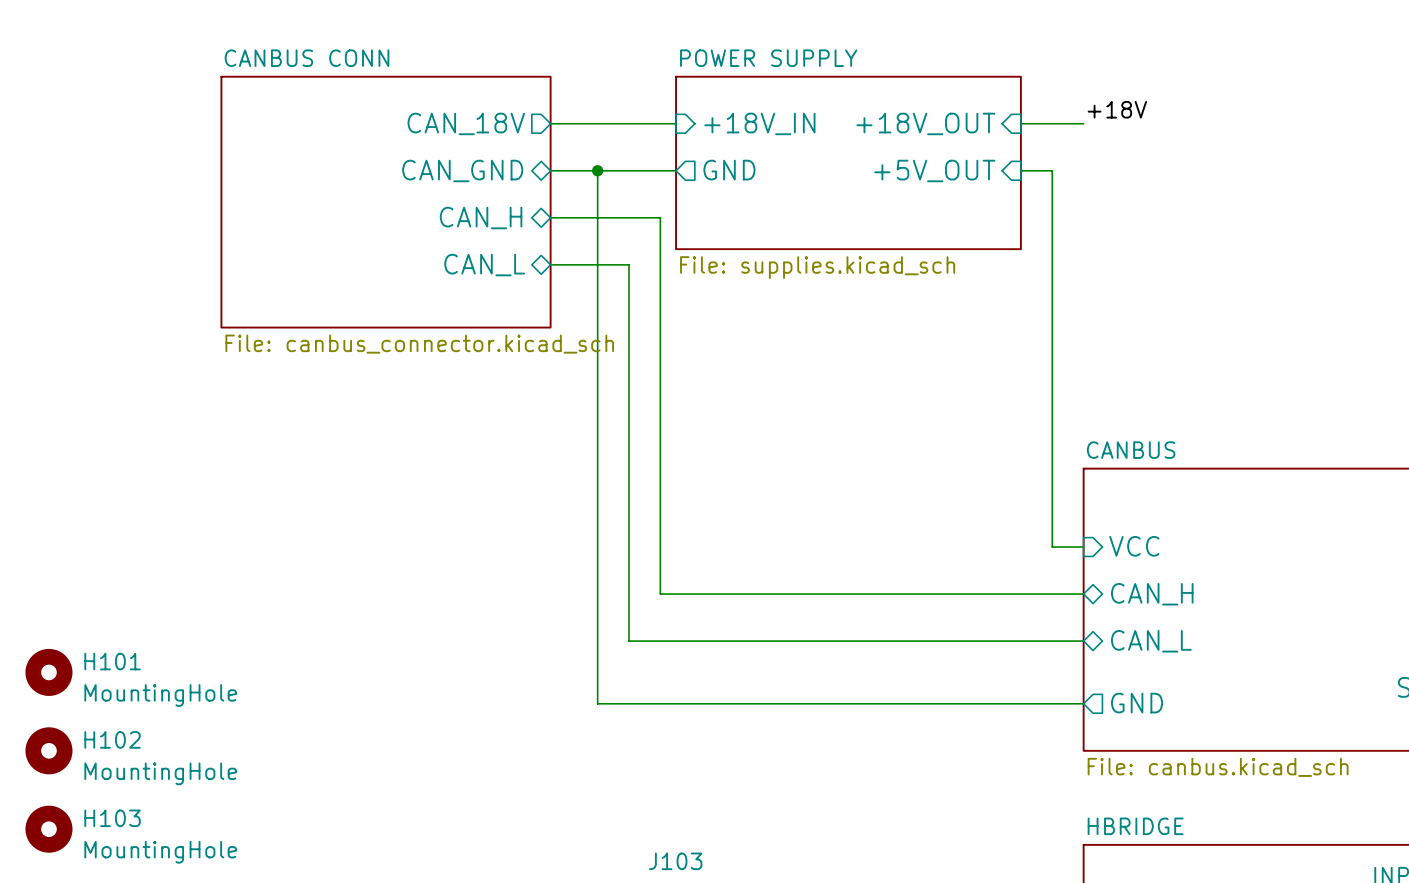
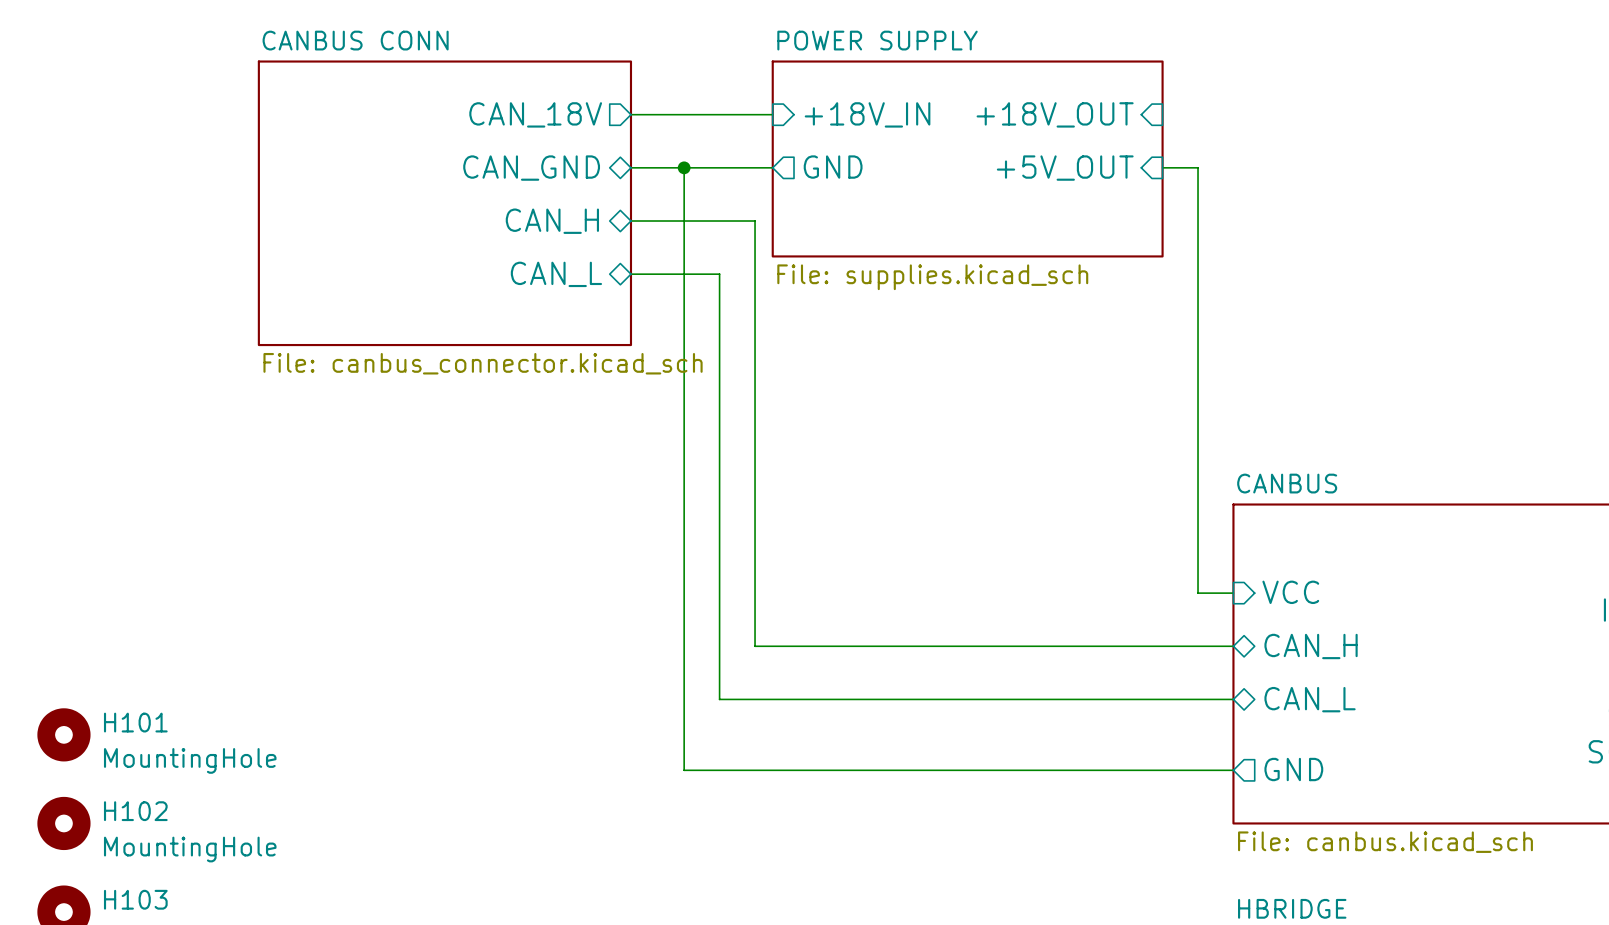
label: +18V (1117, 109) -> none
wire: (1020, 123) (1083, 123) -> none

